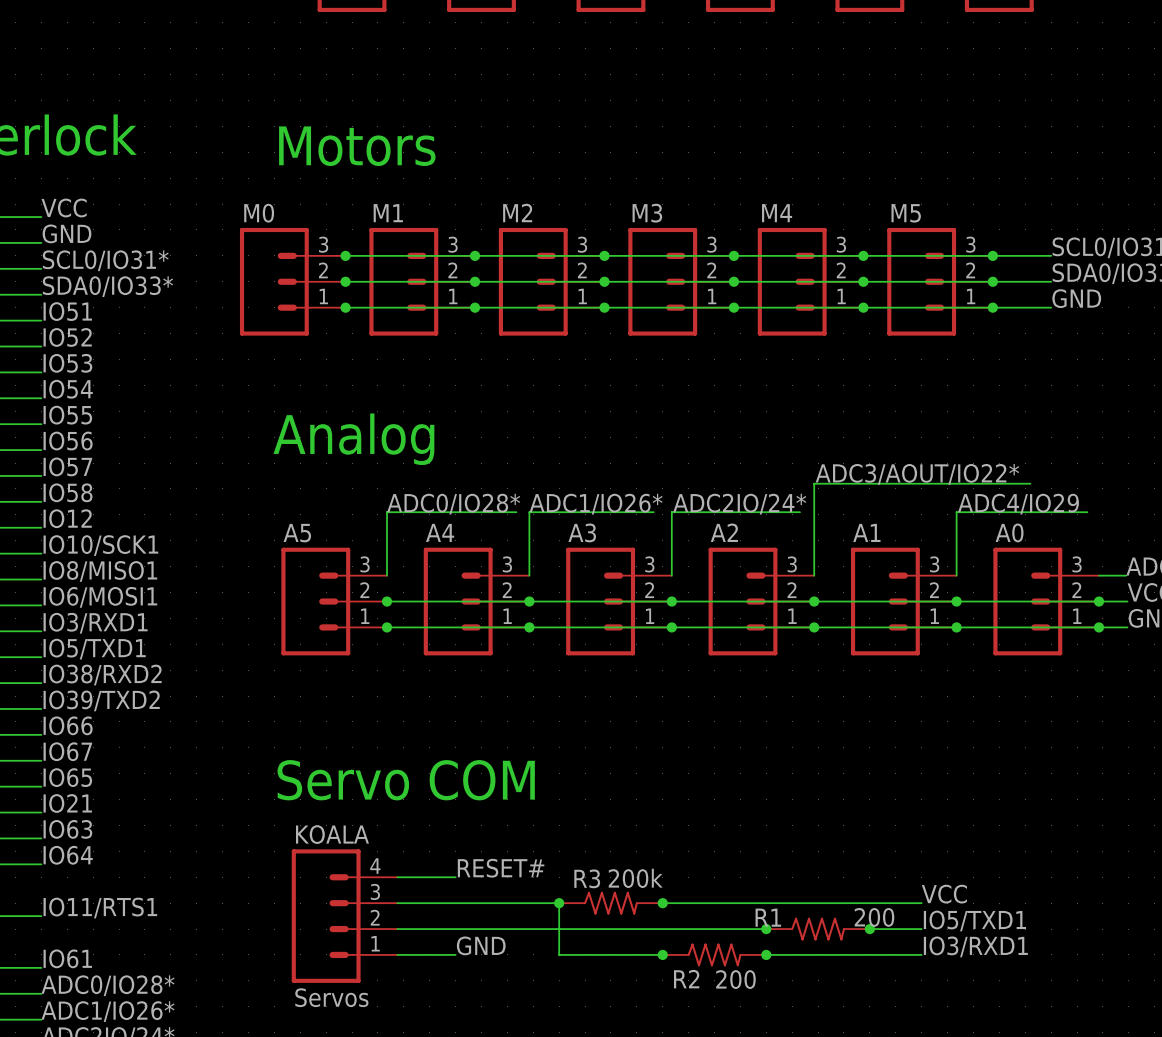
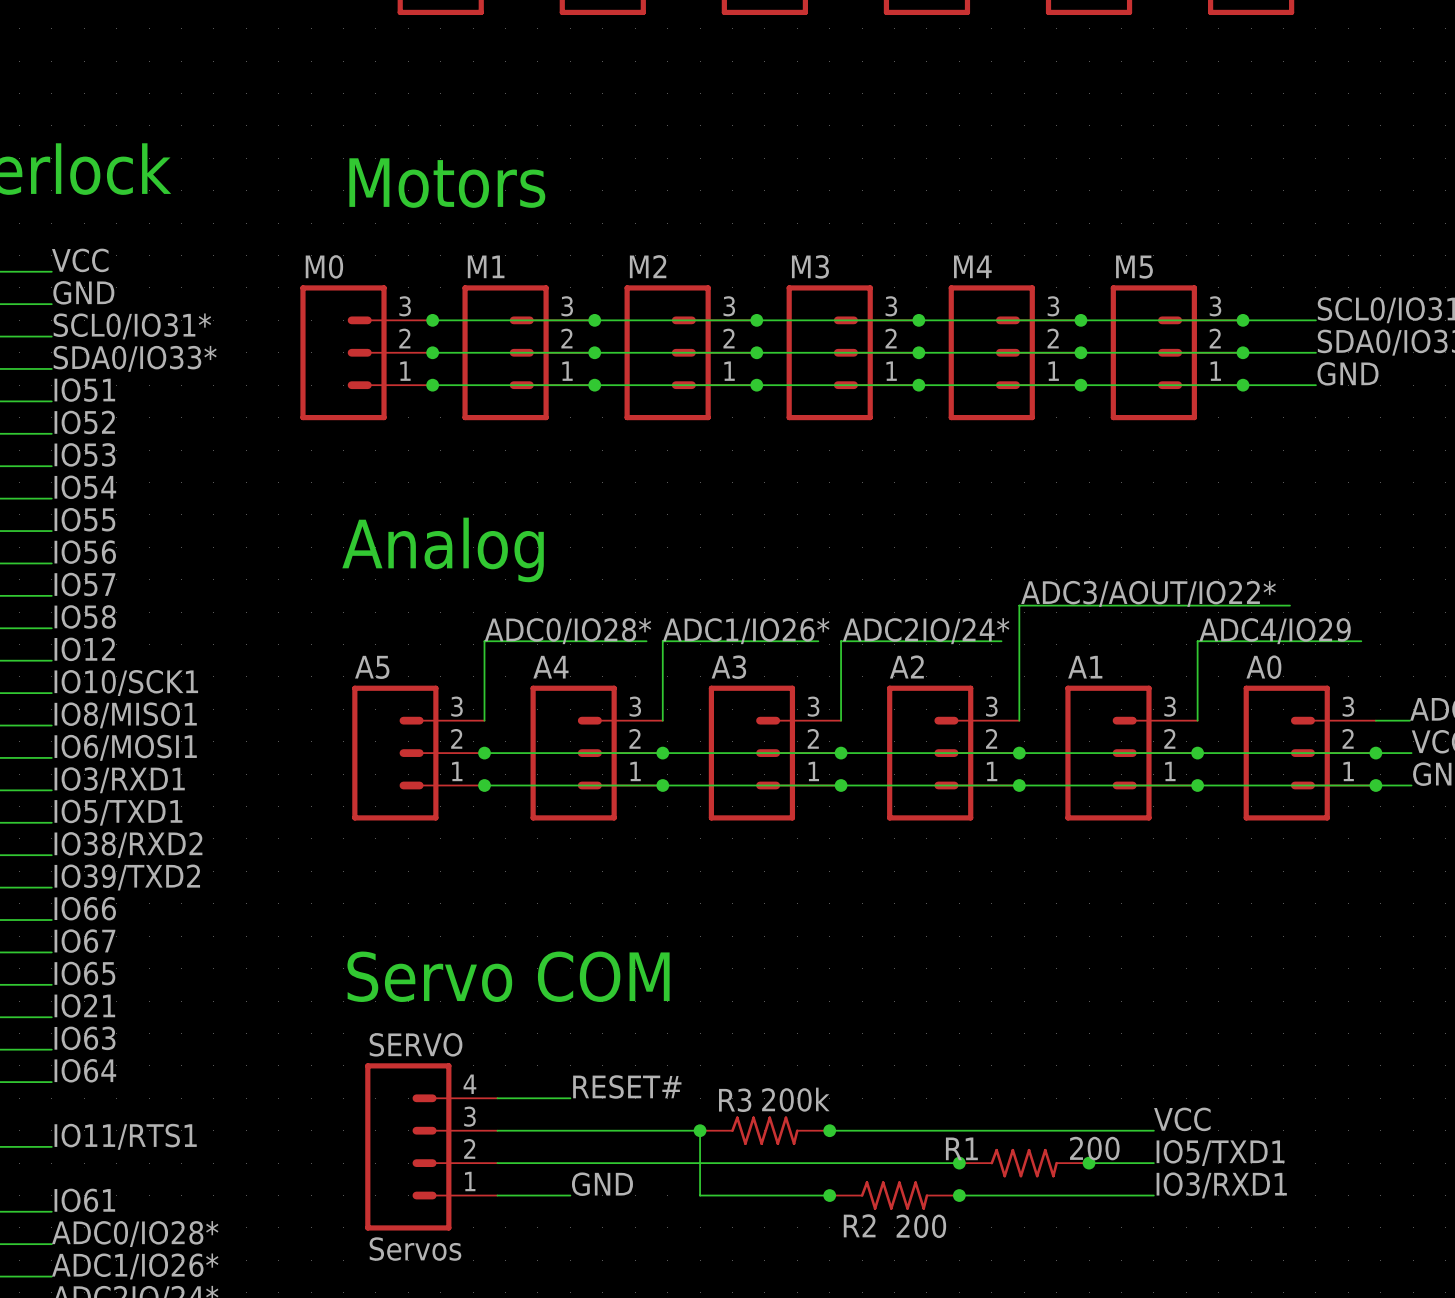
KOALA name: KOALA (332, 834) -> SERVO (416, 1044)

